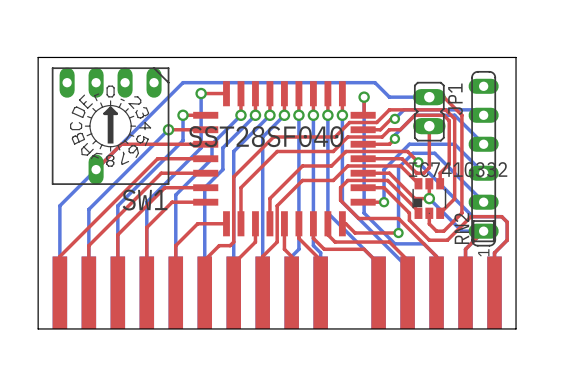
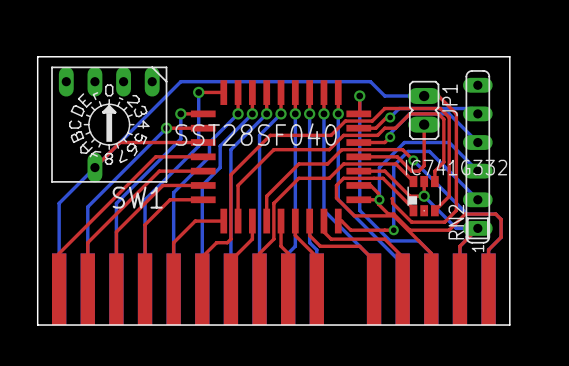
top track: (374, 187) (384, 187) (409, 213) (409, 220) (429, 240) (447, 240) (454, 232) -> (370, 185) (378, 193) (378, 204) (388, 214) (393, 214) (409, 230) (449, 230)
top track: (429, 213) (429, 223) (436, 231) (443, 231) (450, 224) -> (391, 198) (392, 203) (411, 222) (444, 222)

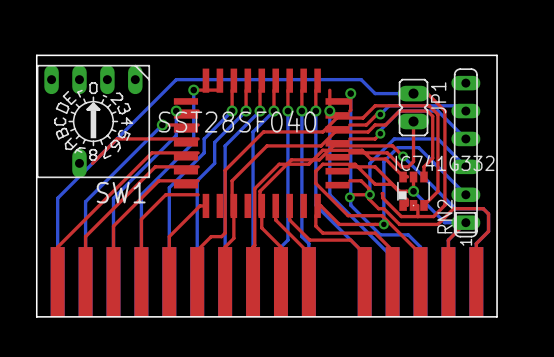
SW1 position: (109, 124) -> (93, 121)
SST28SF040 position: (281, 156) -> (261, 143)
top track: (413, 181) (395, 163) (343, 163) (329, 178) (298, 178) (273, 203) (273, 239) (261, 251) -> (407, 176) (403, 176) (385, 159) (370, 159) (362, 150) (322, 150) (308, 164) (279, 164) (254, 188) (254, 245)
via: none -> (349, 197)
top track: (413, 210) (383, 178) (343, 178) (336, 185) (336, 197) (354, 215) (393, 215) (431, 253) (431, 260) -> (407, 205) (407, 200) (391, 184) (375, 184) (355, 164) (322, 164) (315, 171) (315, 183) (348, 215) (382, 215) (420, 254)
top track: none -> (417, 205) (417, 216)
top track: (195, 221) (223, 221) -> (190, 215) (200, 205) (205, 205)
top track: (252, 221) (252, 239) (230, 260) -> (233, 205) (233, 238) (225, 247) (225, 254)
top track: (281, 221) (281, 246) -> (261, 205) (261, 227) (273, 240)
top track: (295, 221) (295, 235) (316, 257) -> (275, 205) (275, 220) (306, 250) (308, 250)
top track: (309, 221) (309, 235) (320, 246) -> (289, 205) (289, 220) (309, 240) (312, 240)
top track: (338, 221) (341, 221) (350, 230) -> (317, 205) (320, 205) (339, 224) (342, 224)

